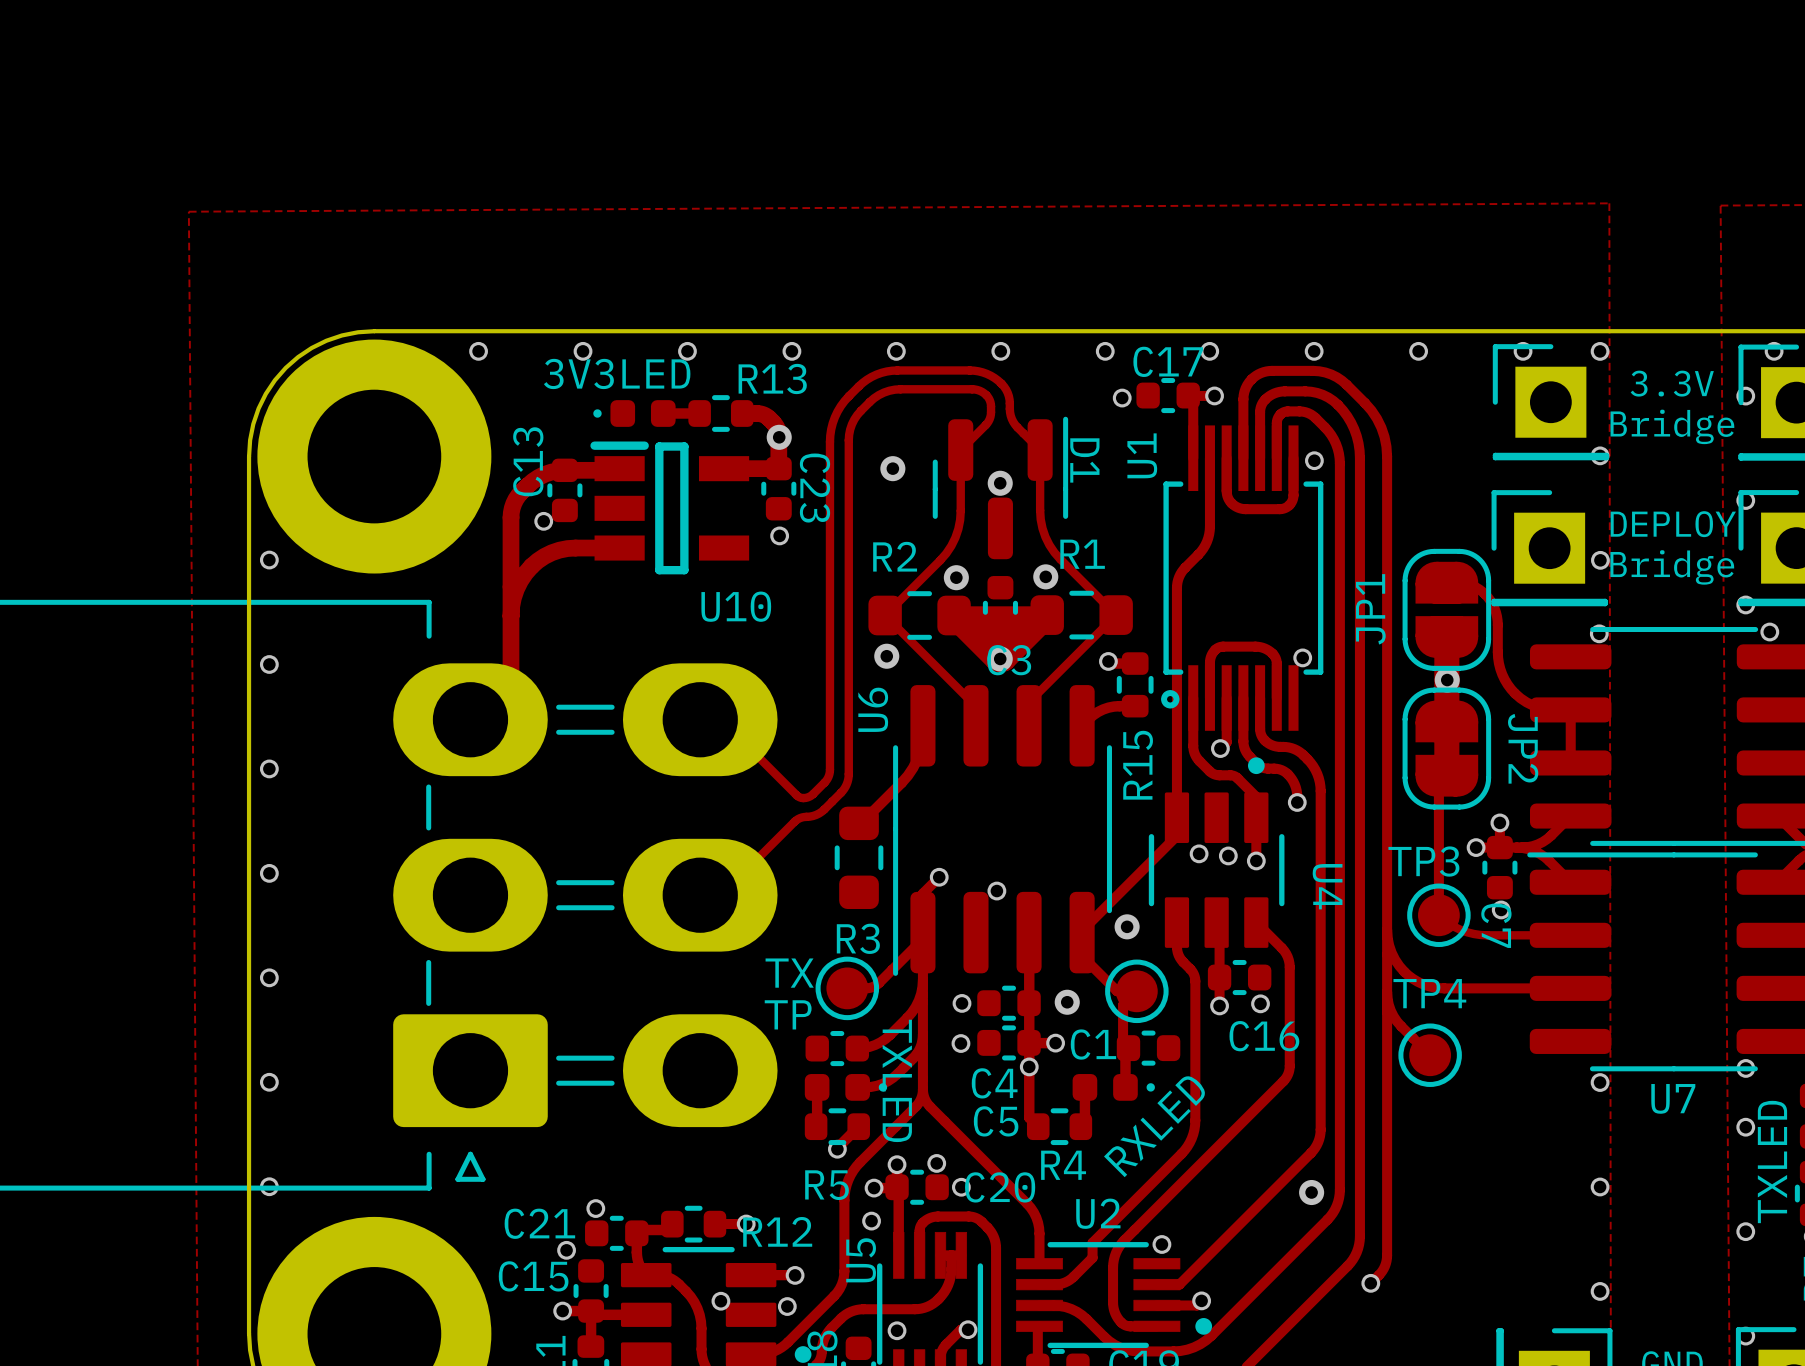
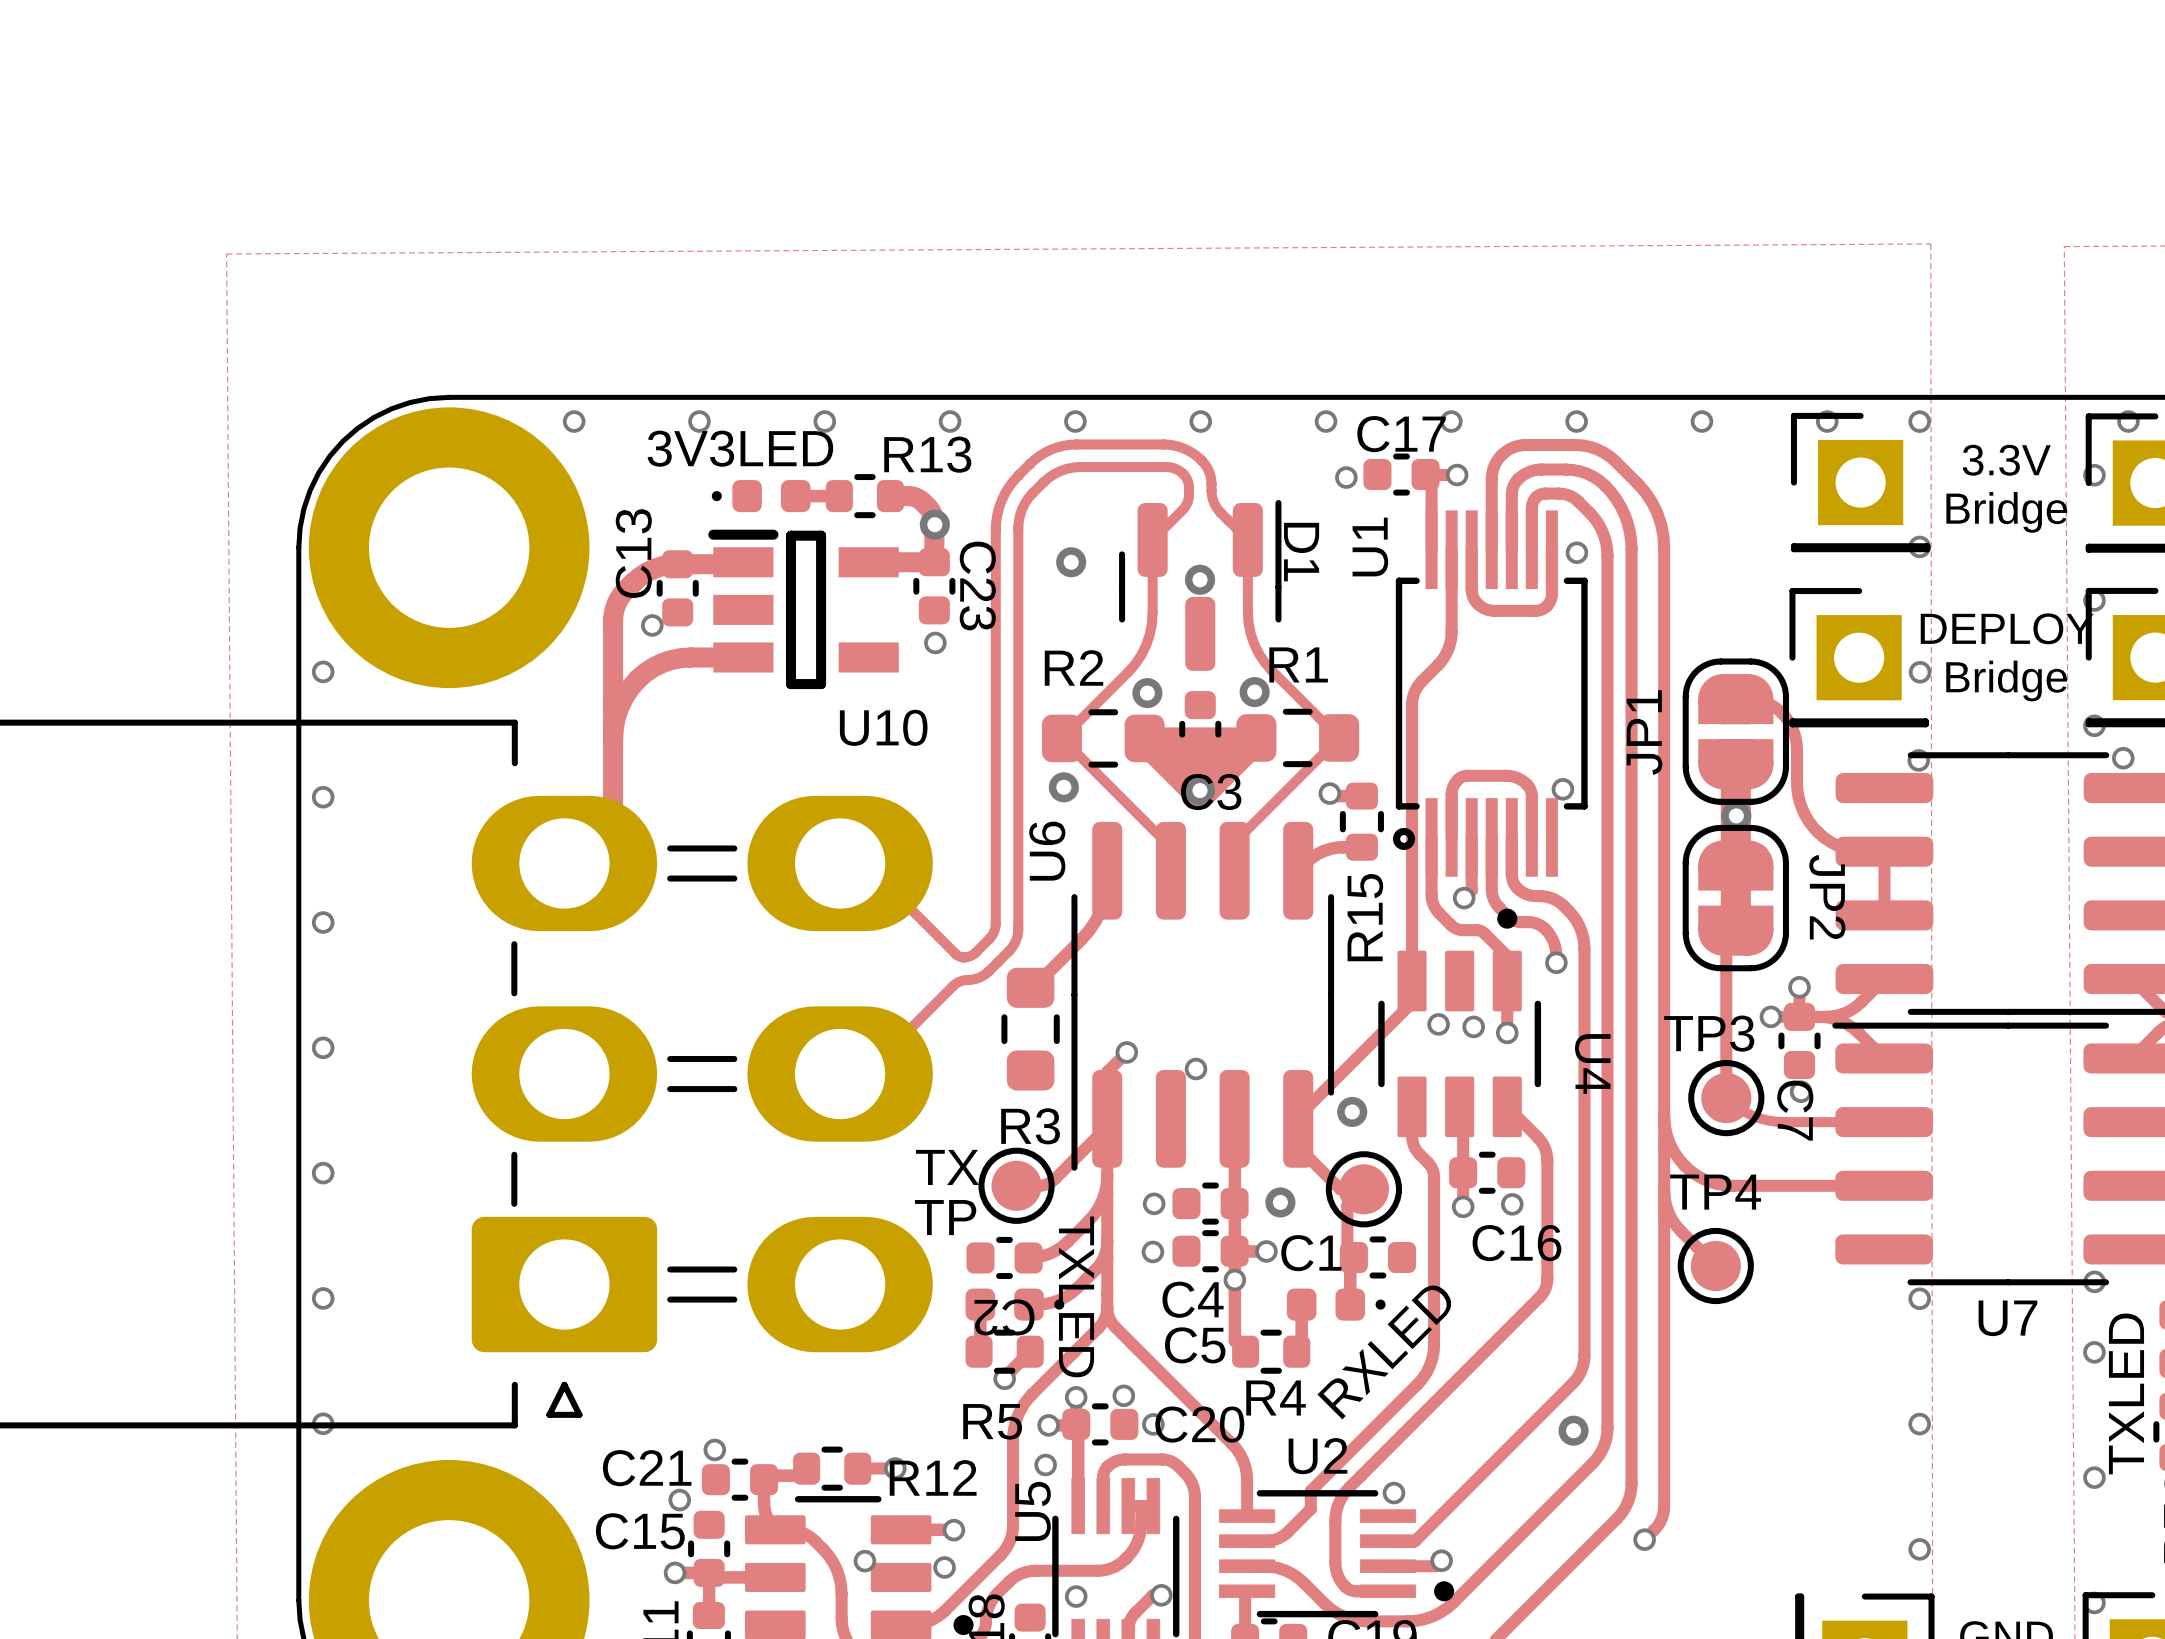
C2 name: none -> C2 (1004, 1317)

